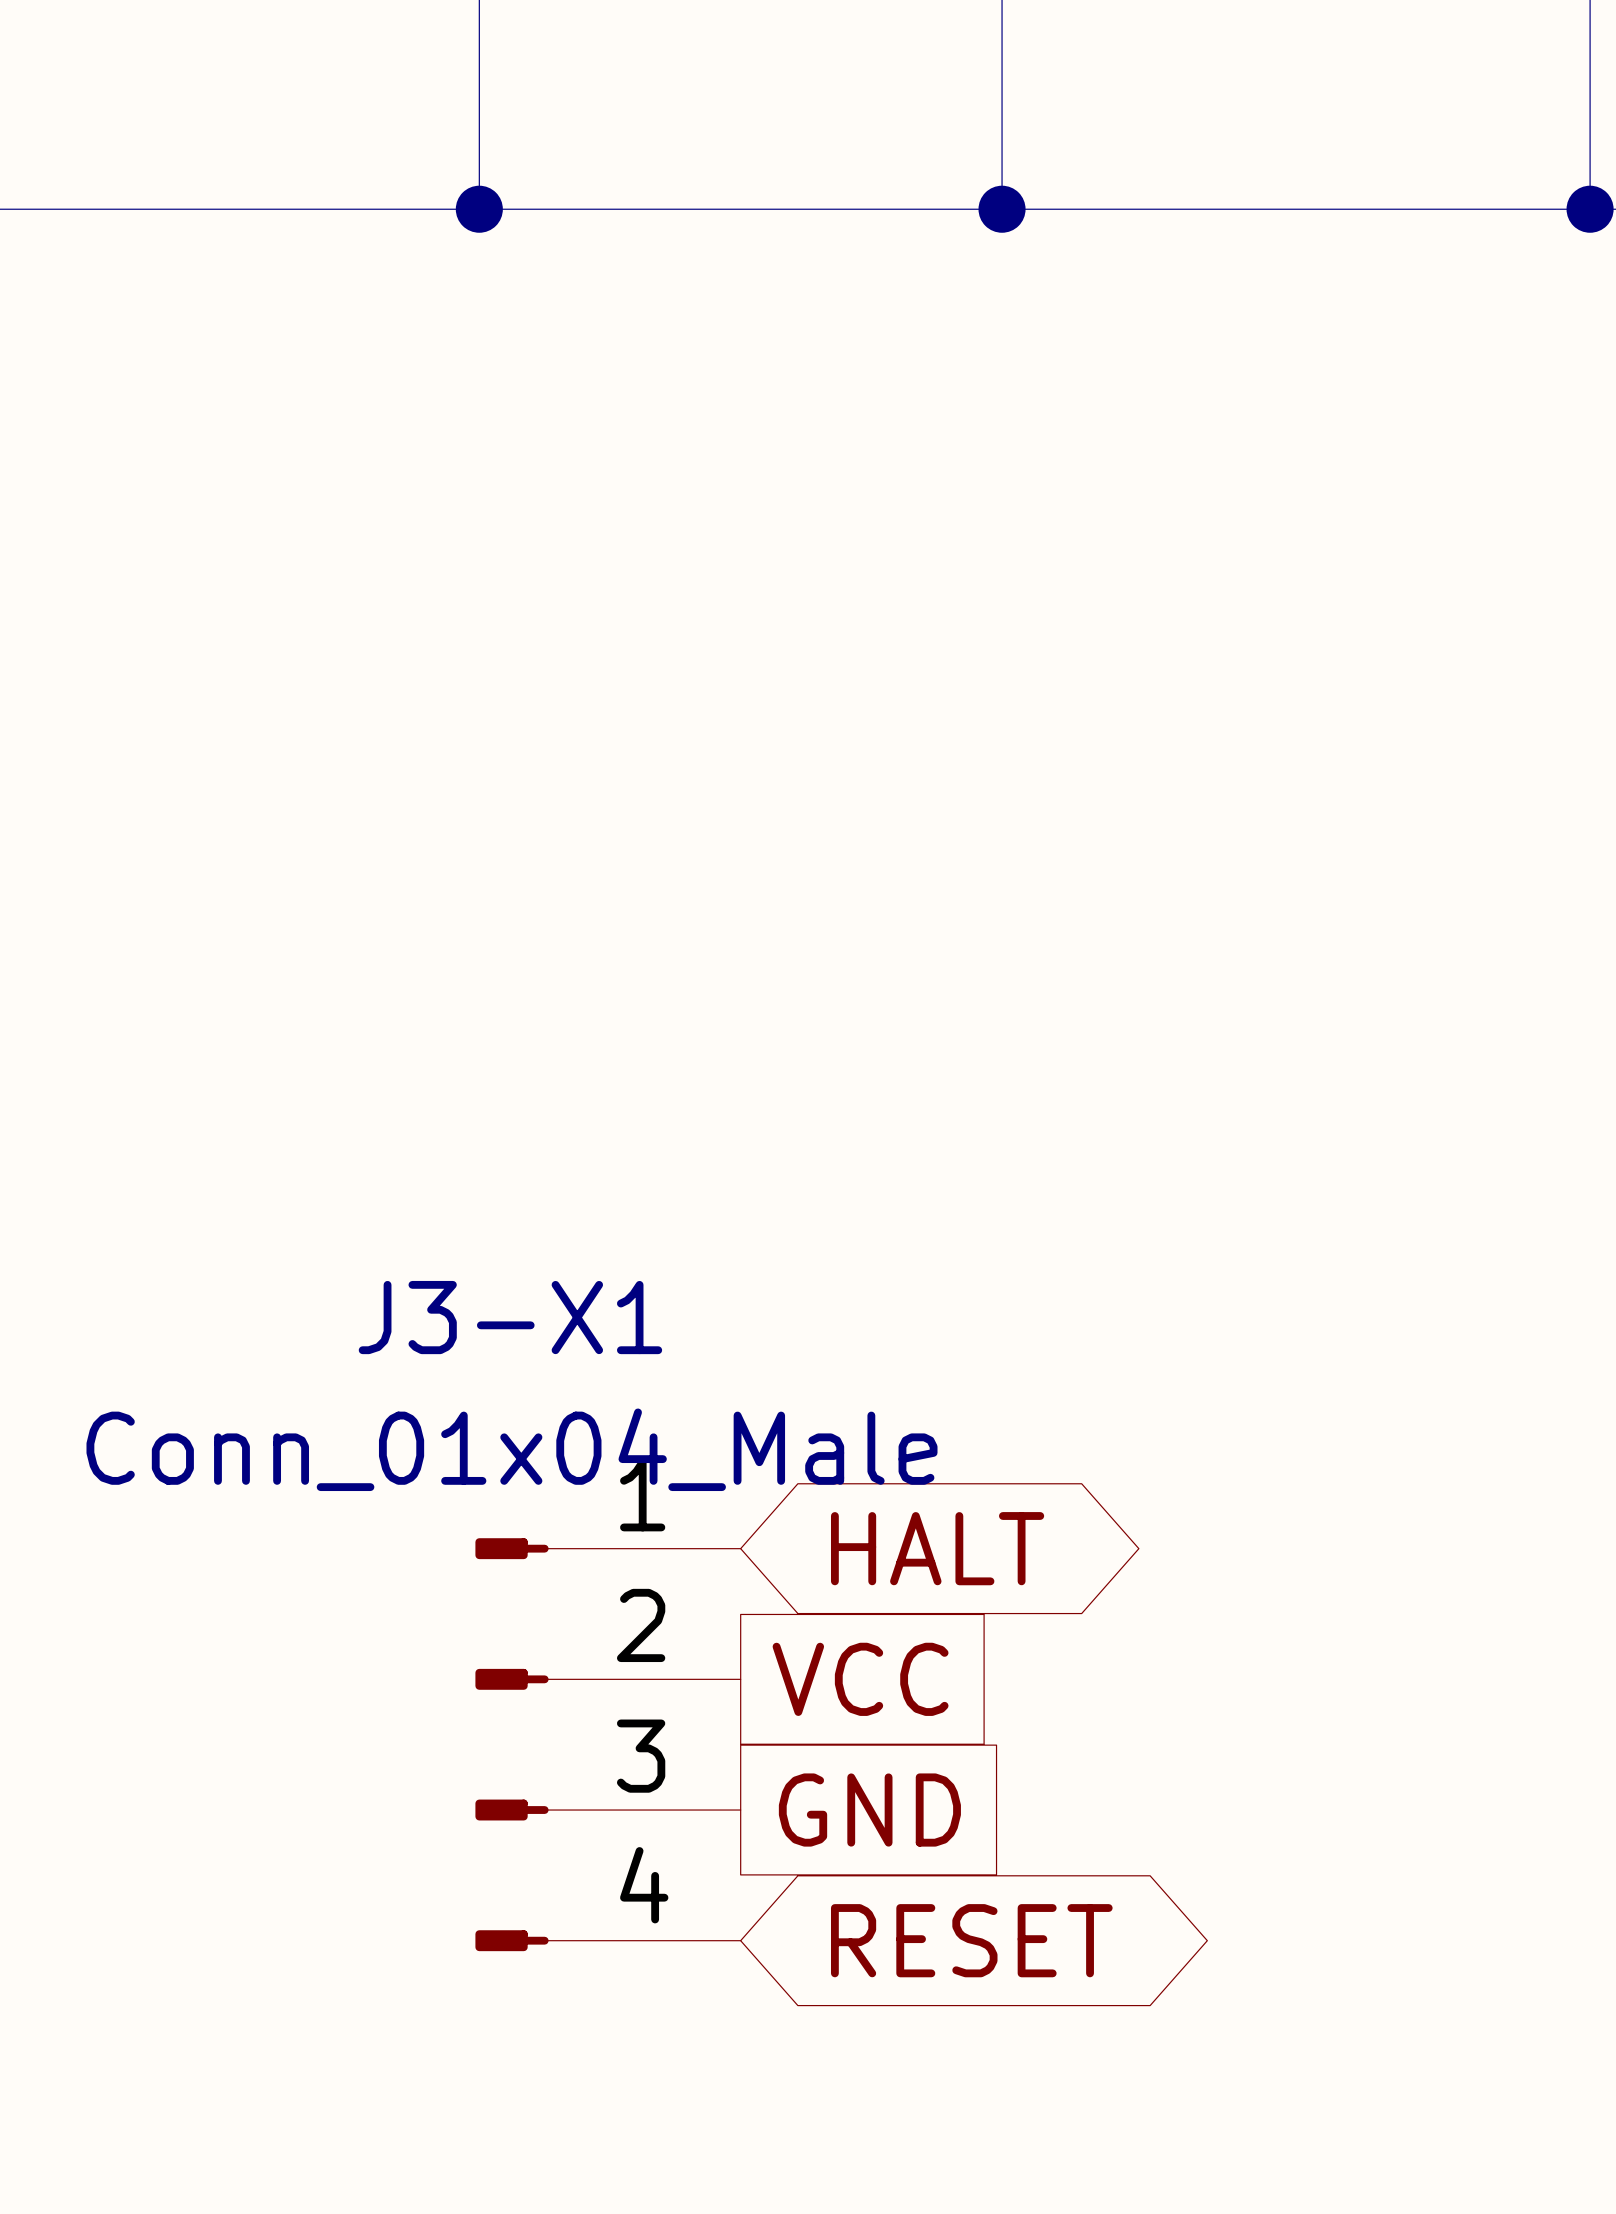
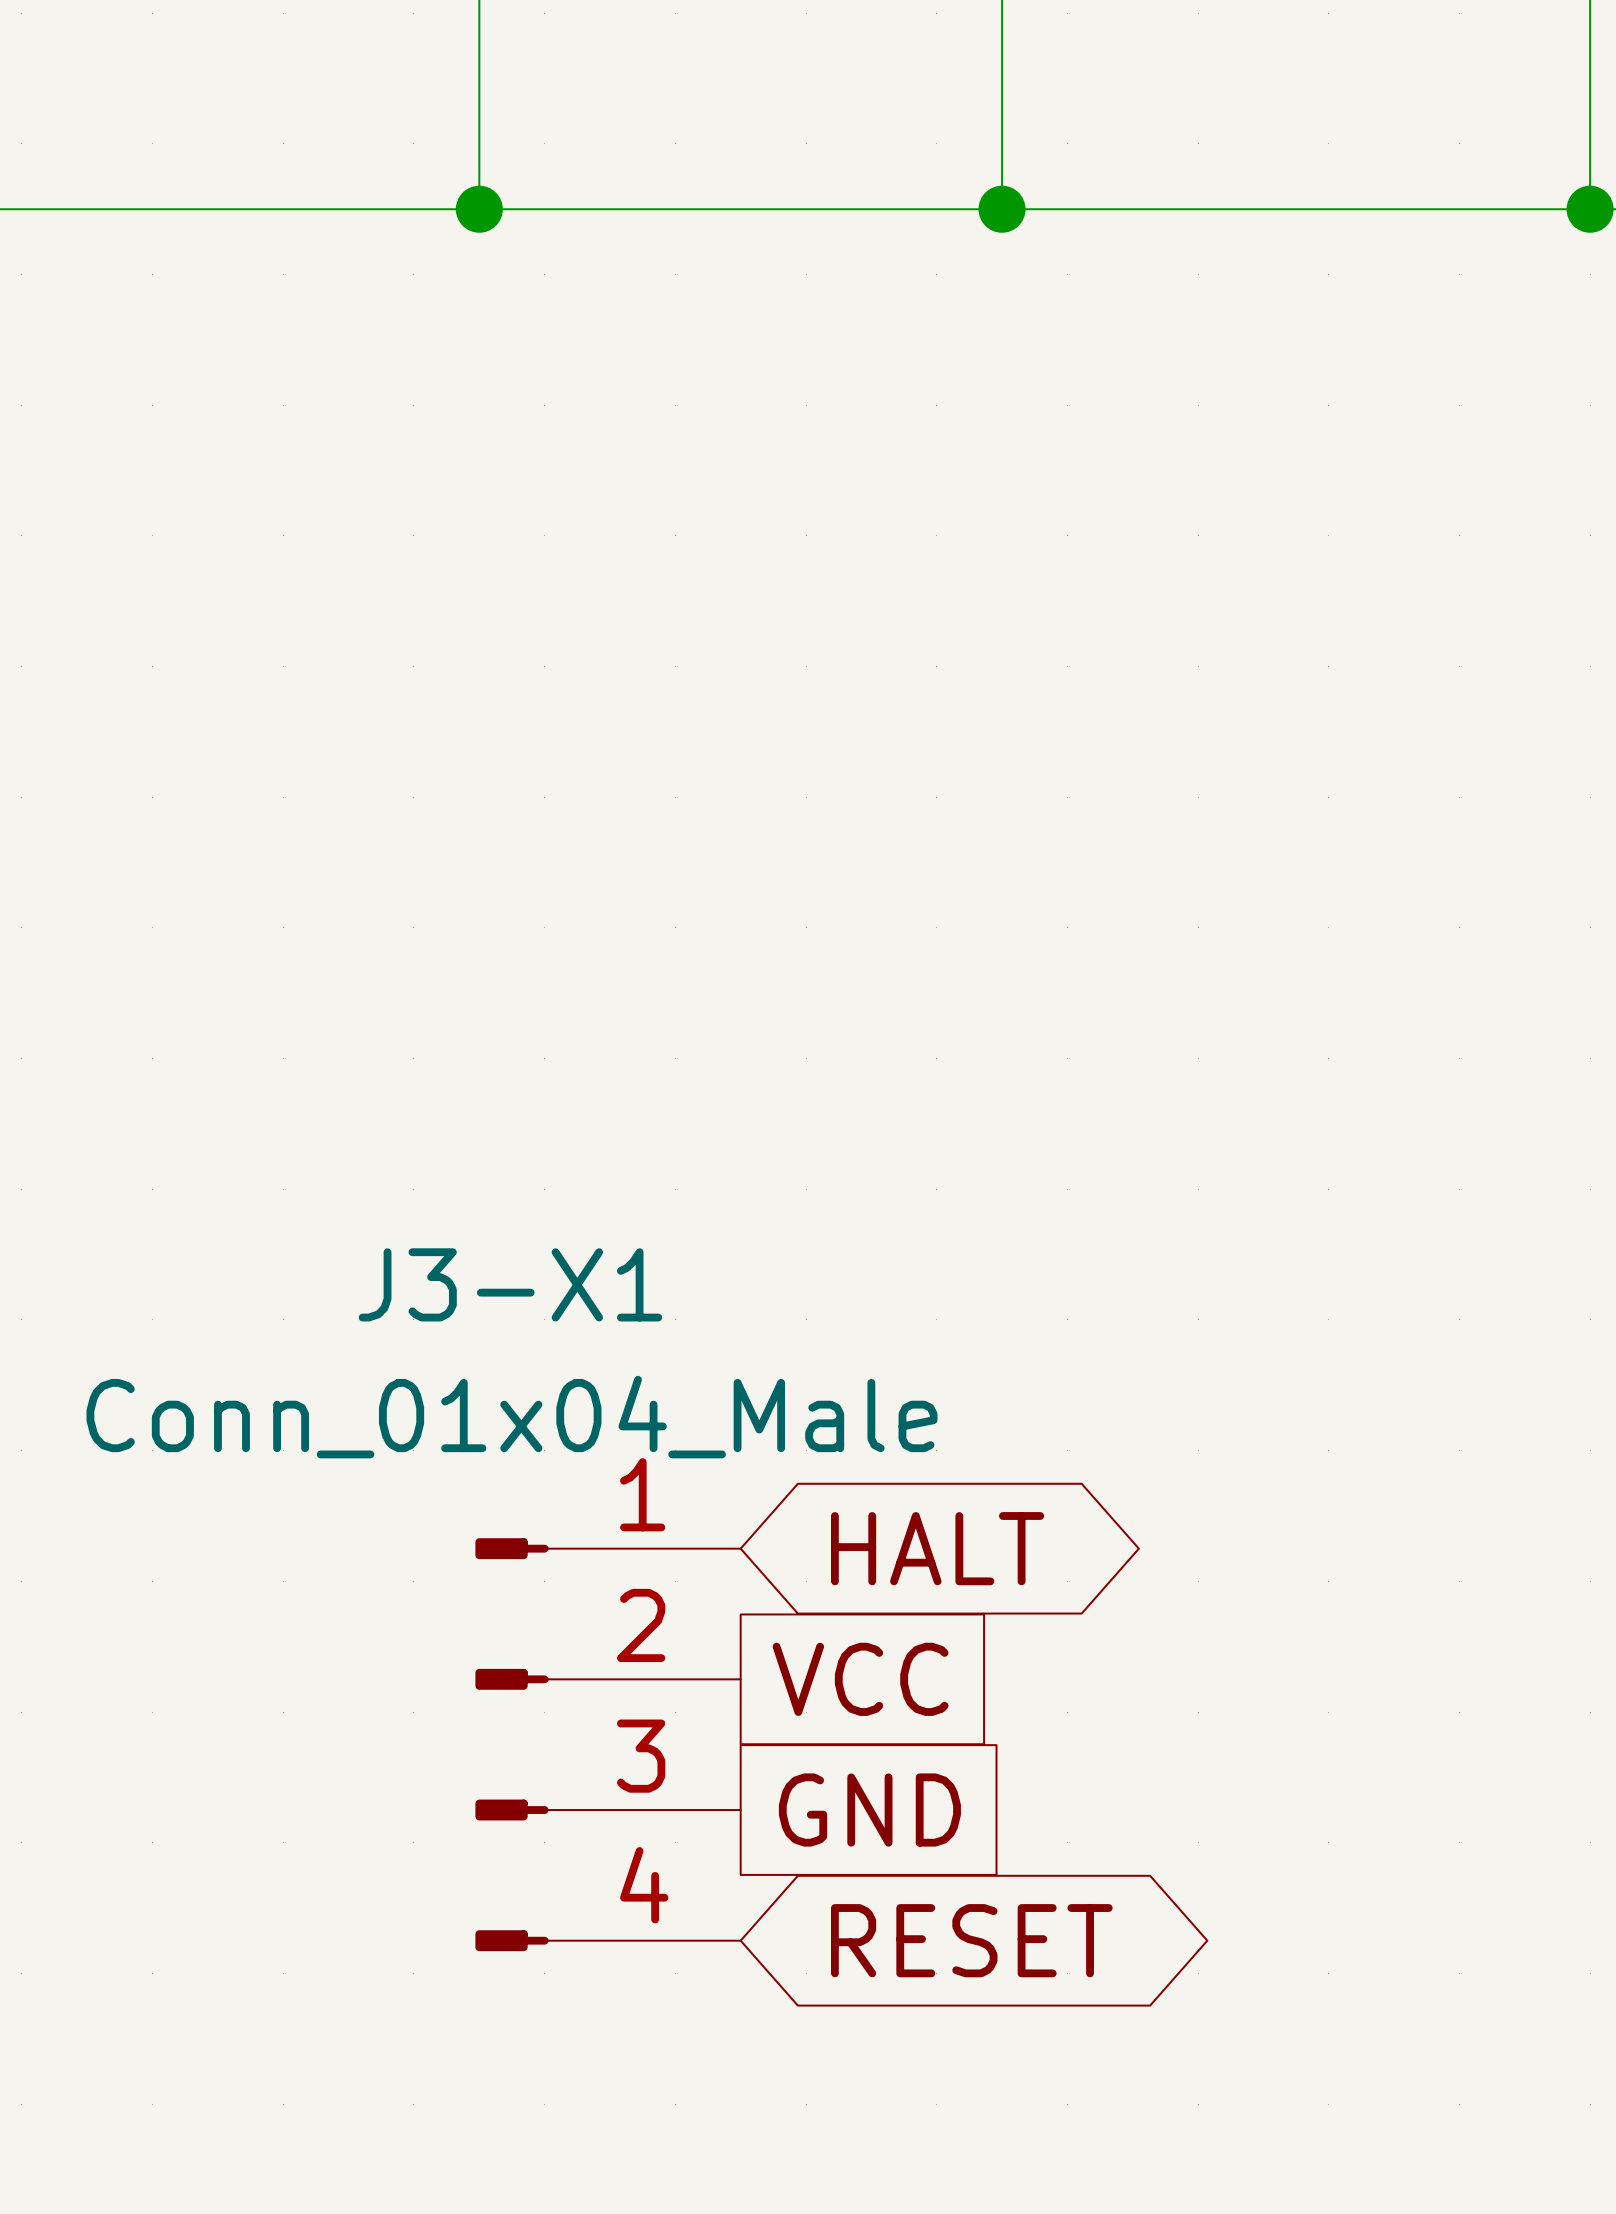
J3-X1 name position: J3-X1 (510, 1317) -> J3-X1 (510, 1284)
J3-X1 value position: Conn_01x04_Male (512, 1449) -> Conn_01x04_Male (512, 1417)

